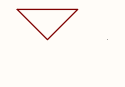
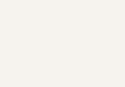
power symbol: (47, 24) -> none

